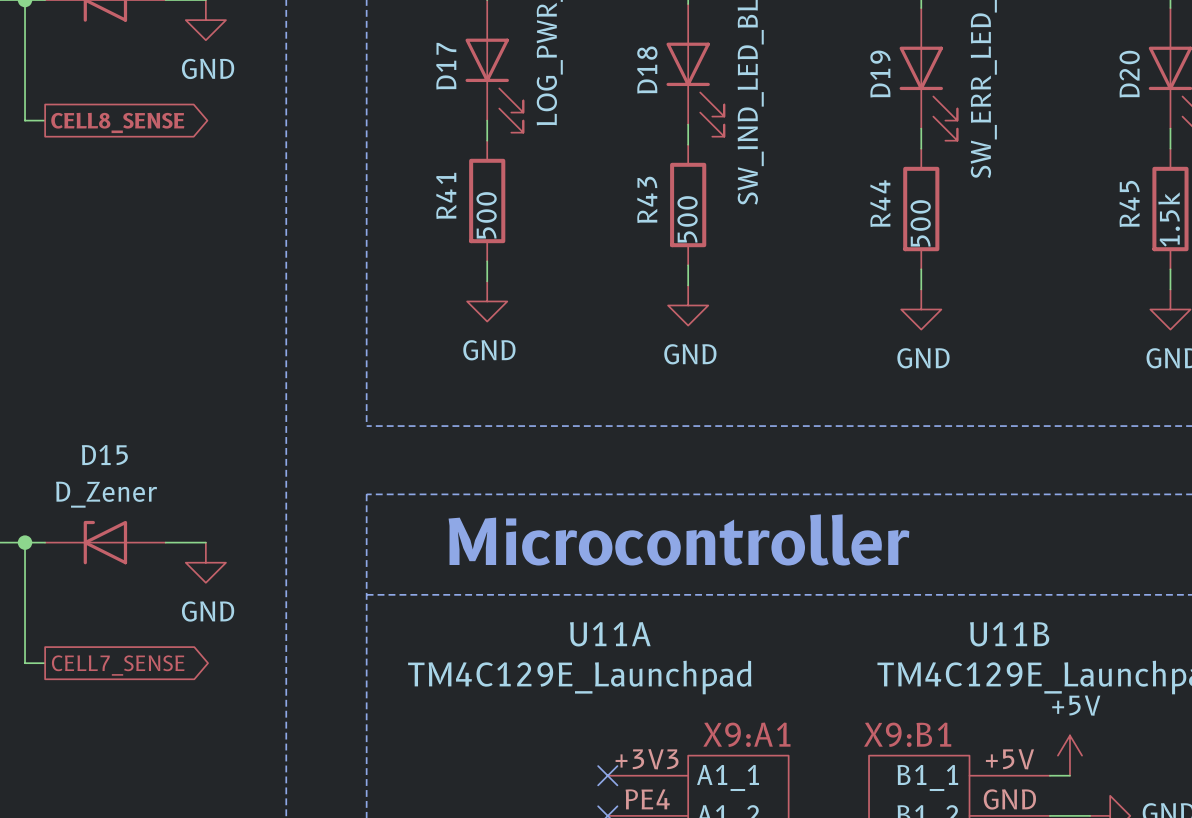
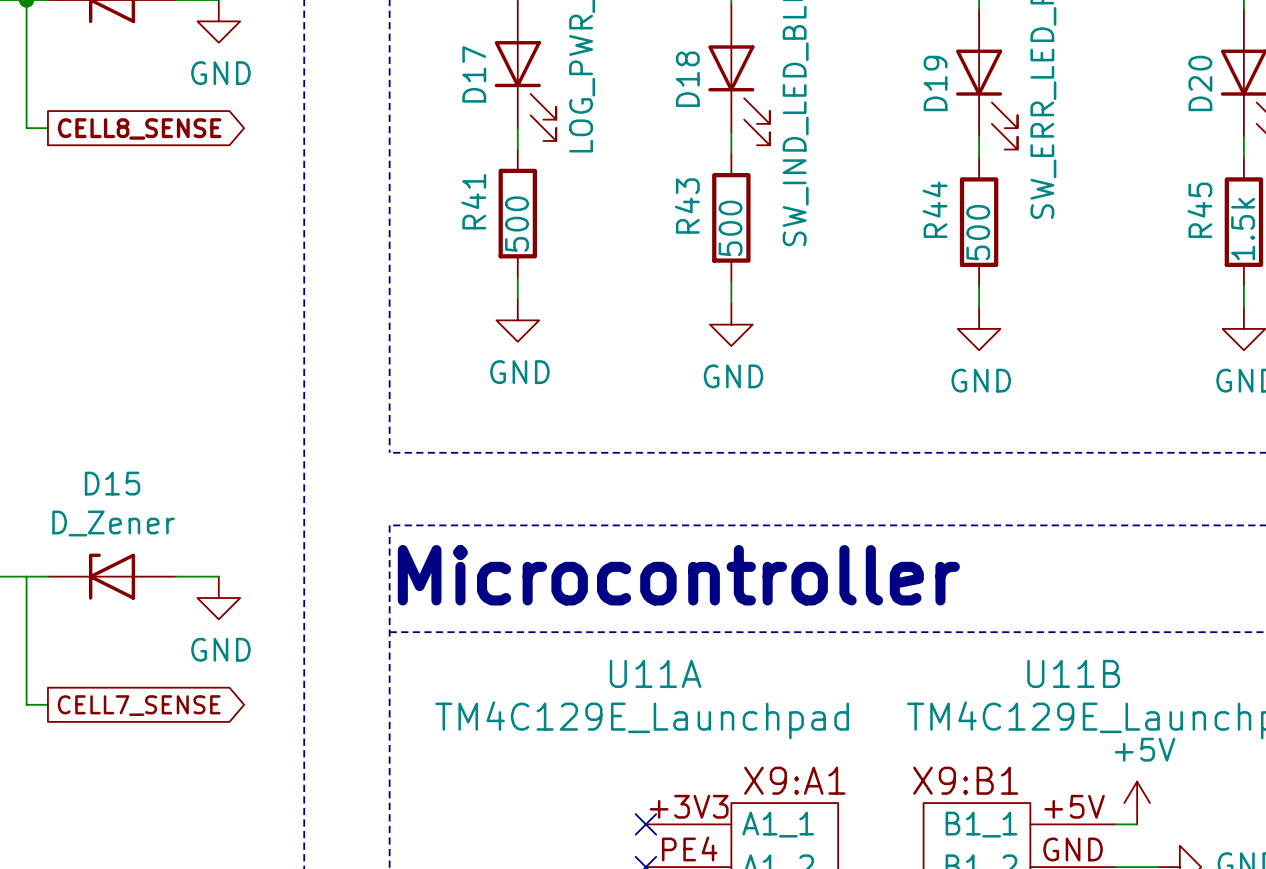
junction: (25, 542) -> none

